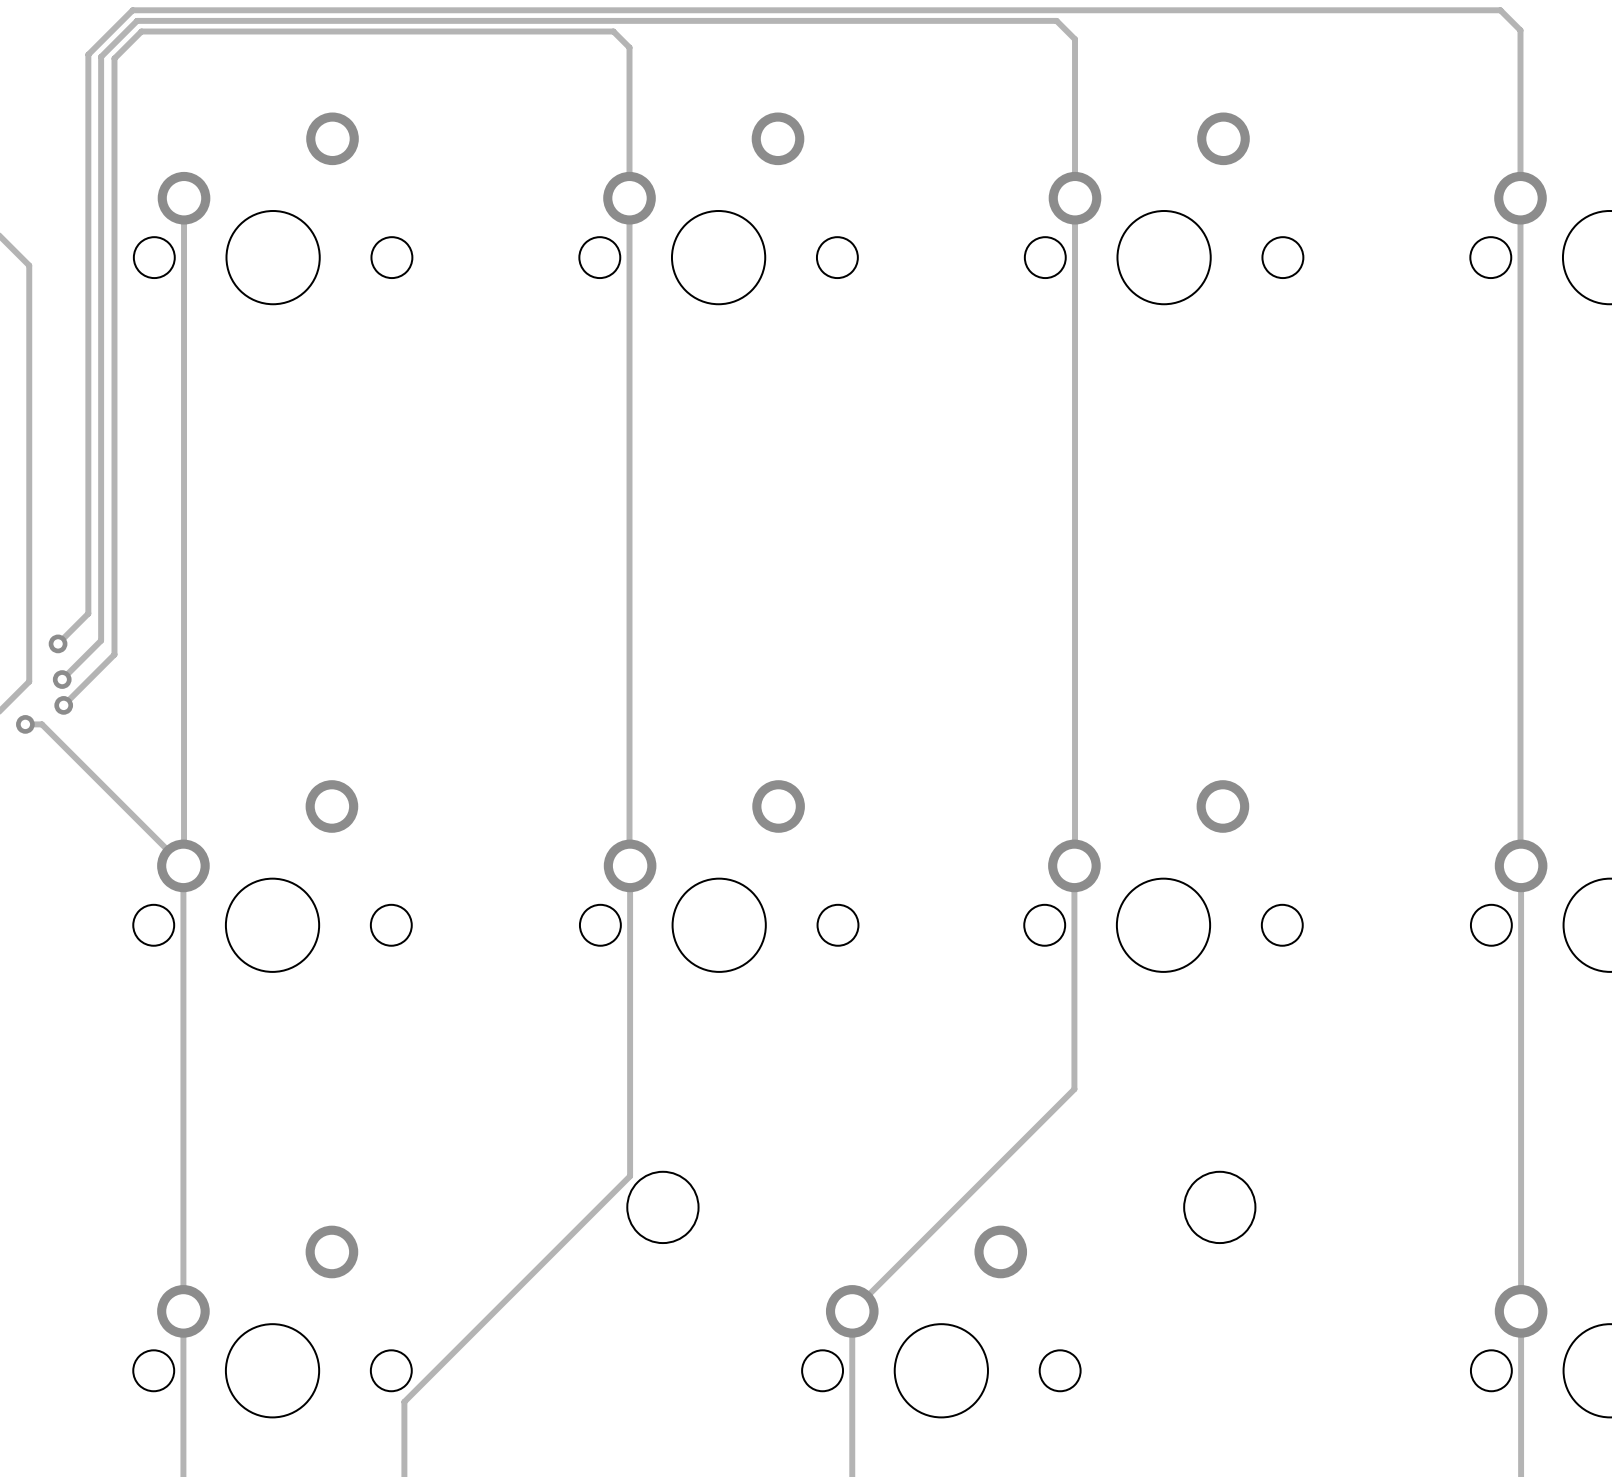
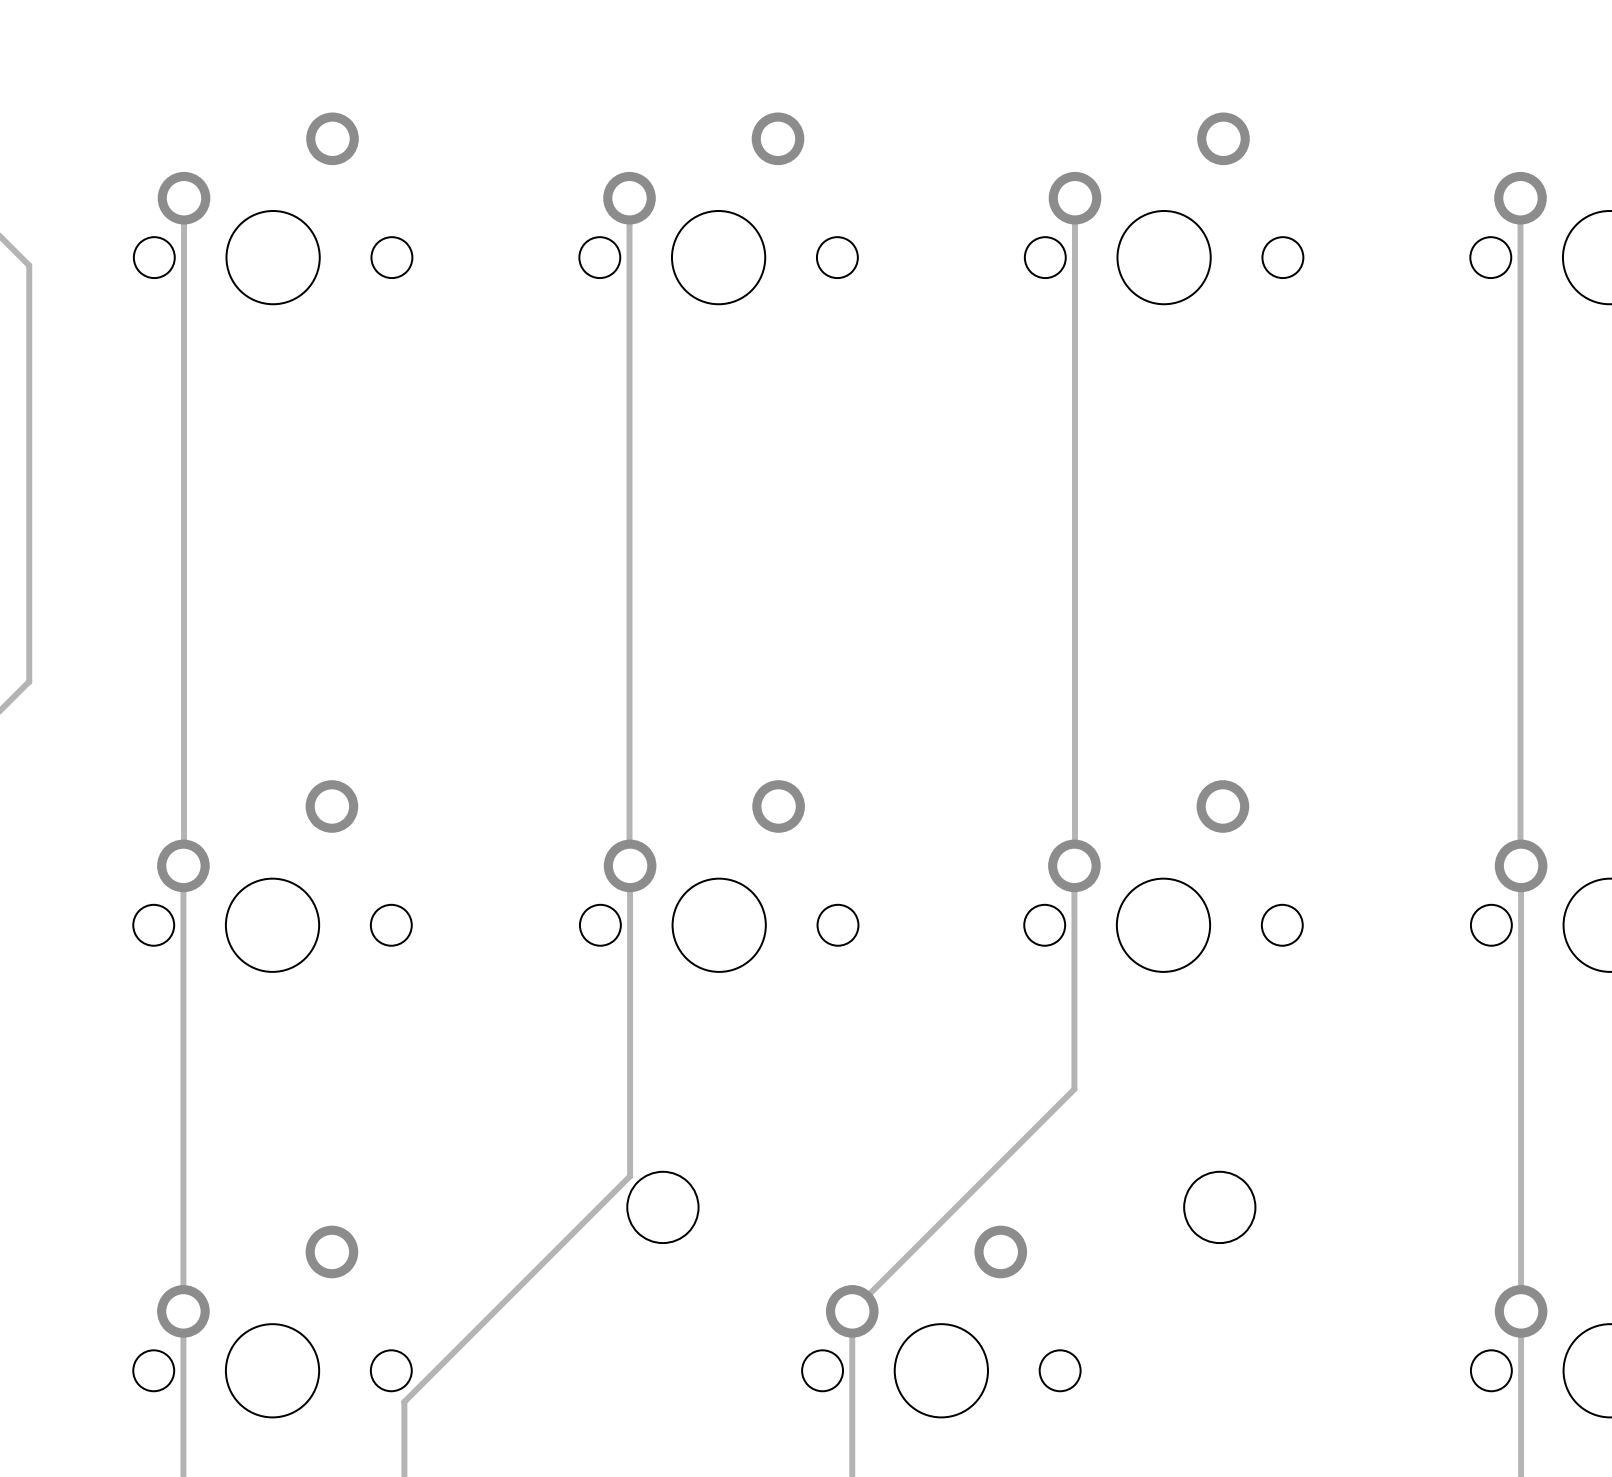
track: (629, 198) (629, 47) (613, 31) (141, 31) (114, 58) (114, 654) (63, 705) -> none
track: (1075, 198) (1075, 39) (1056, 20) (137, 20) (101, 56) (101, 640) (62, 679) -> none
track: (1520, 198) (1520, 30) (1500, 10) (132, 10) (88, 54) (88, 613) (58, 643) -> none
via: (58, 643) -> none
via: (62, 679) -> none
via: (63, 705) -> none
track: (25, 724) (41, 724) (183, 865) -> none
via: (25, 724) -> none

